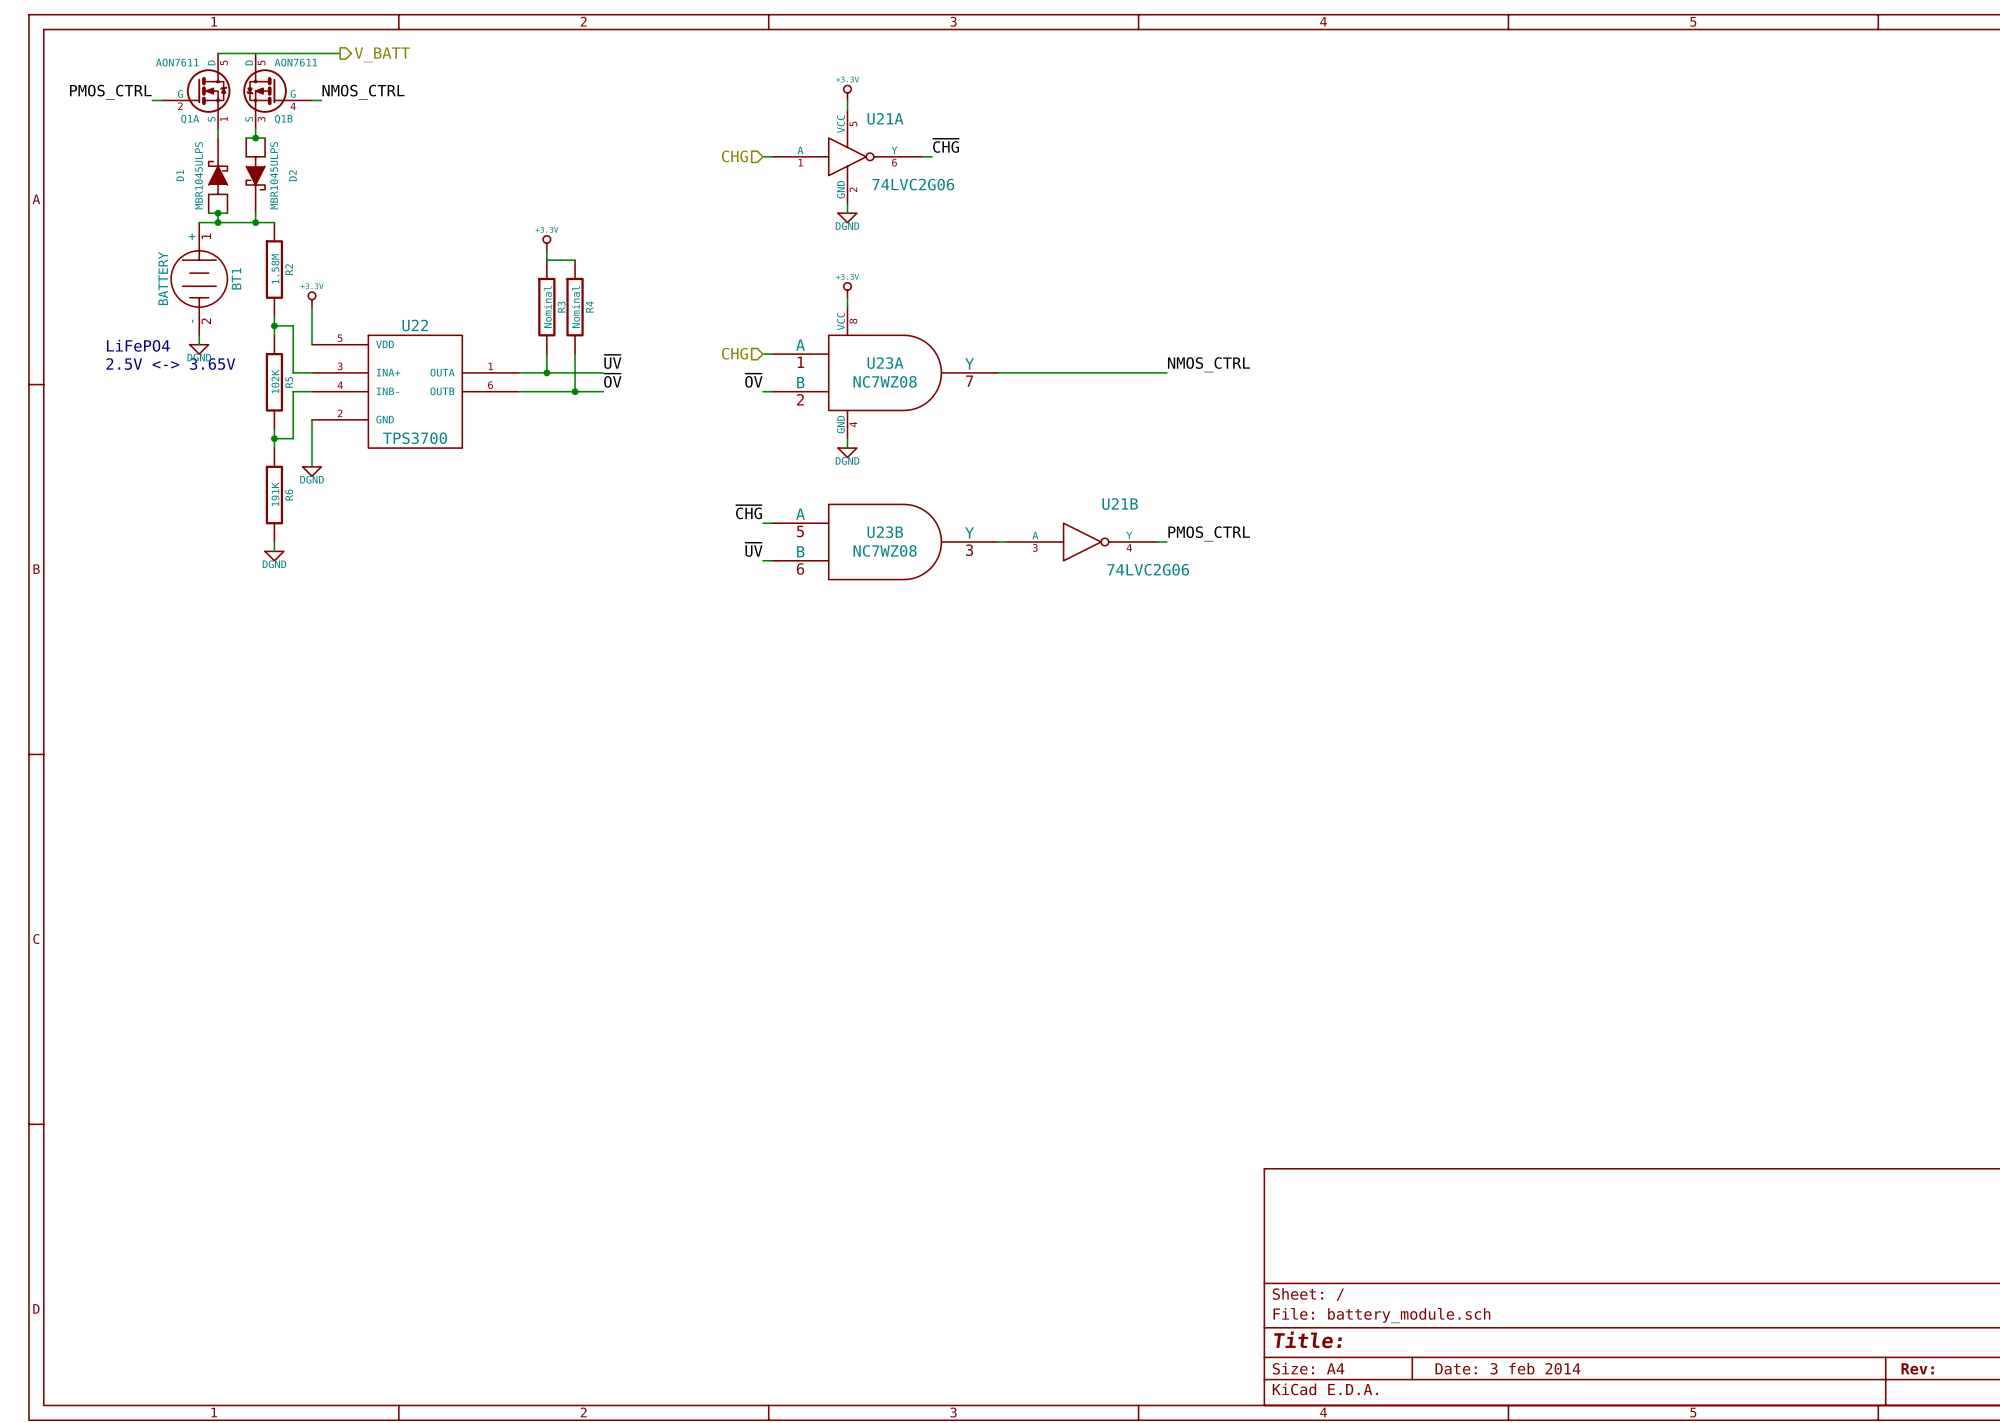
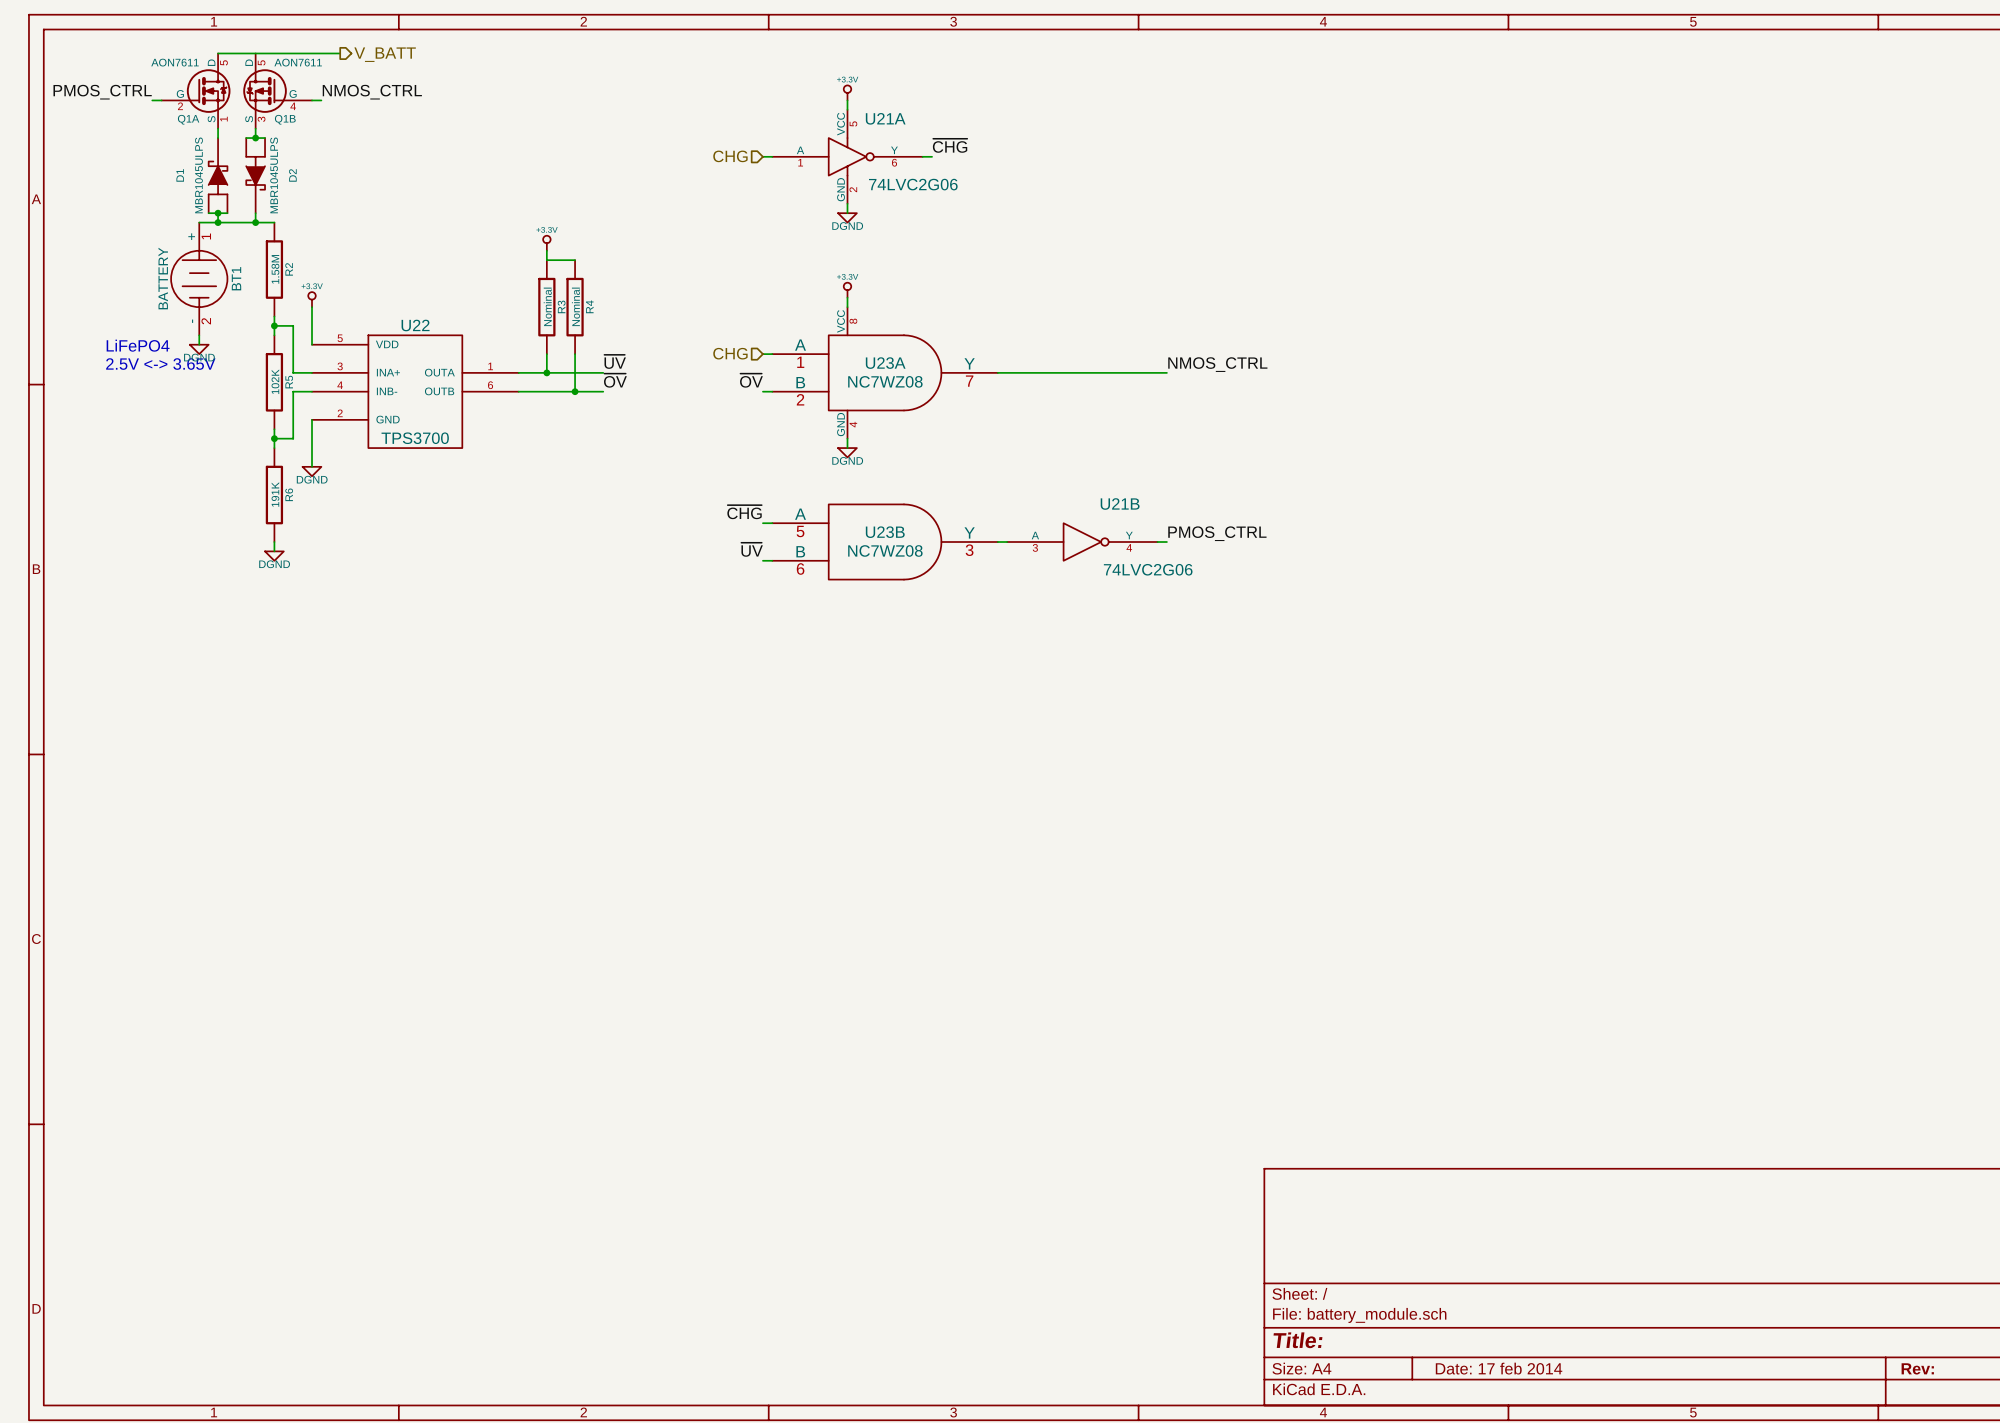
title block: Date: 3 feb 2014 (1507, 1368) -> Date: 17 feb 2014 (1499, 1368)

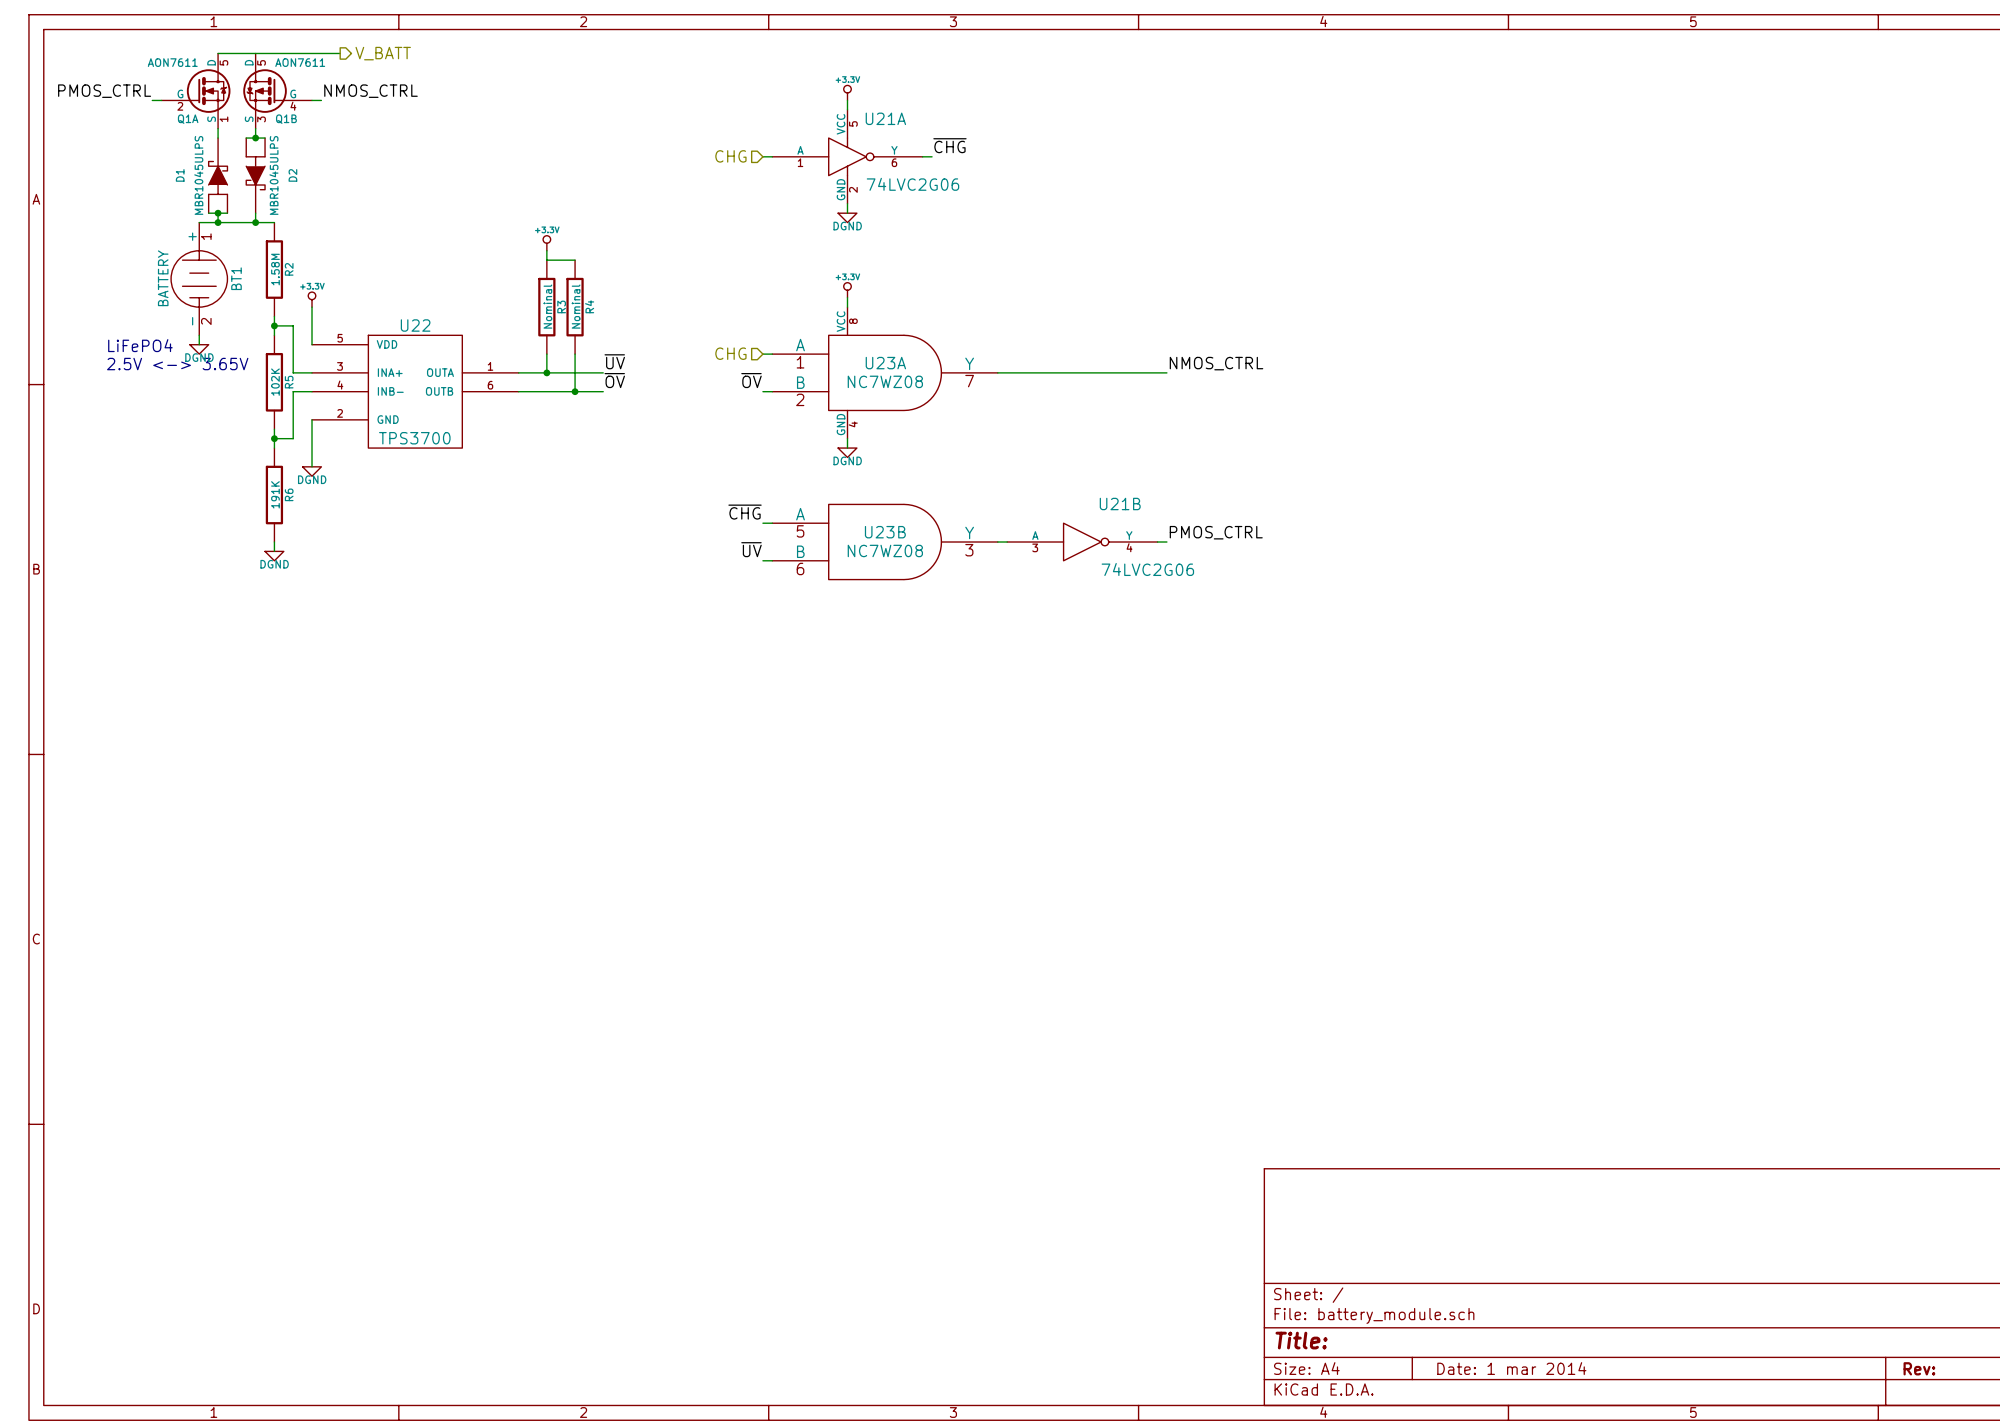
title block: Date: 17 feb 2014 (1499, 1368) -> Date: 1 mar 2014 (1511, 1368)

